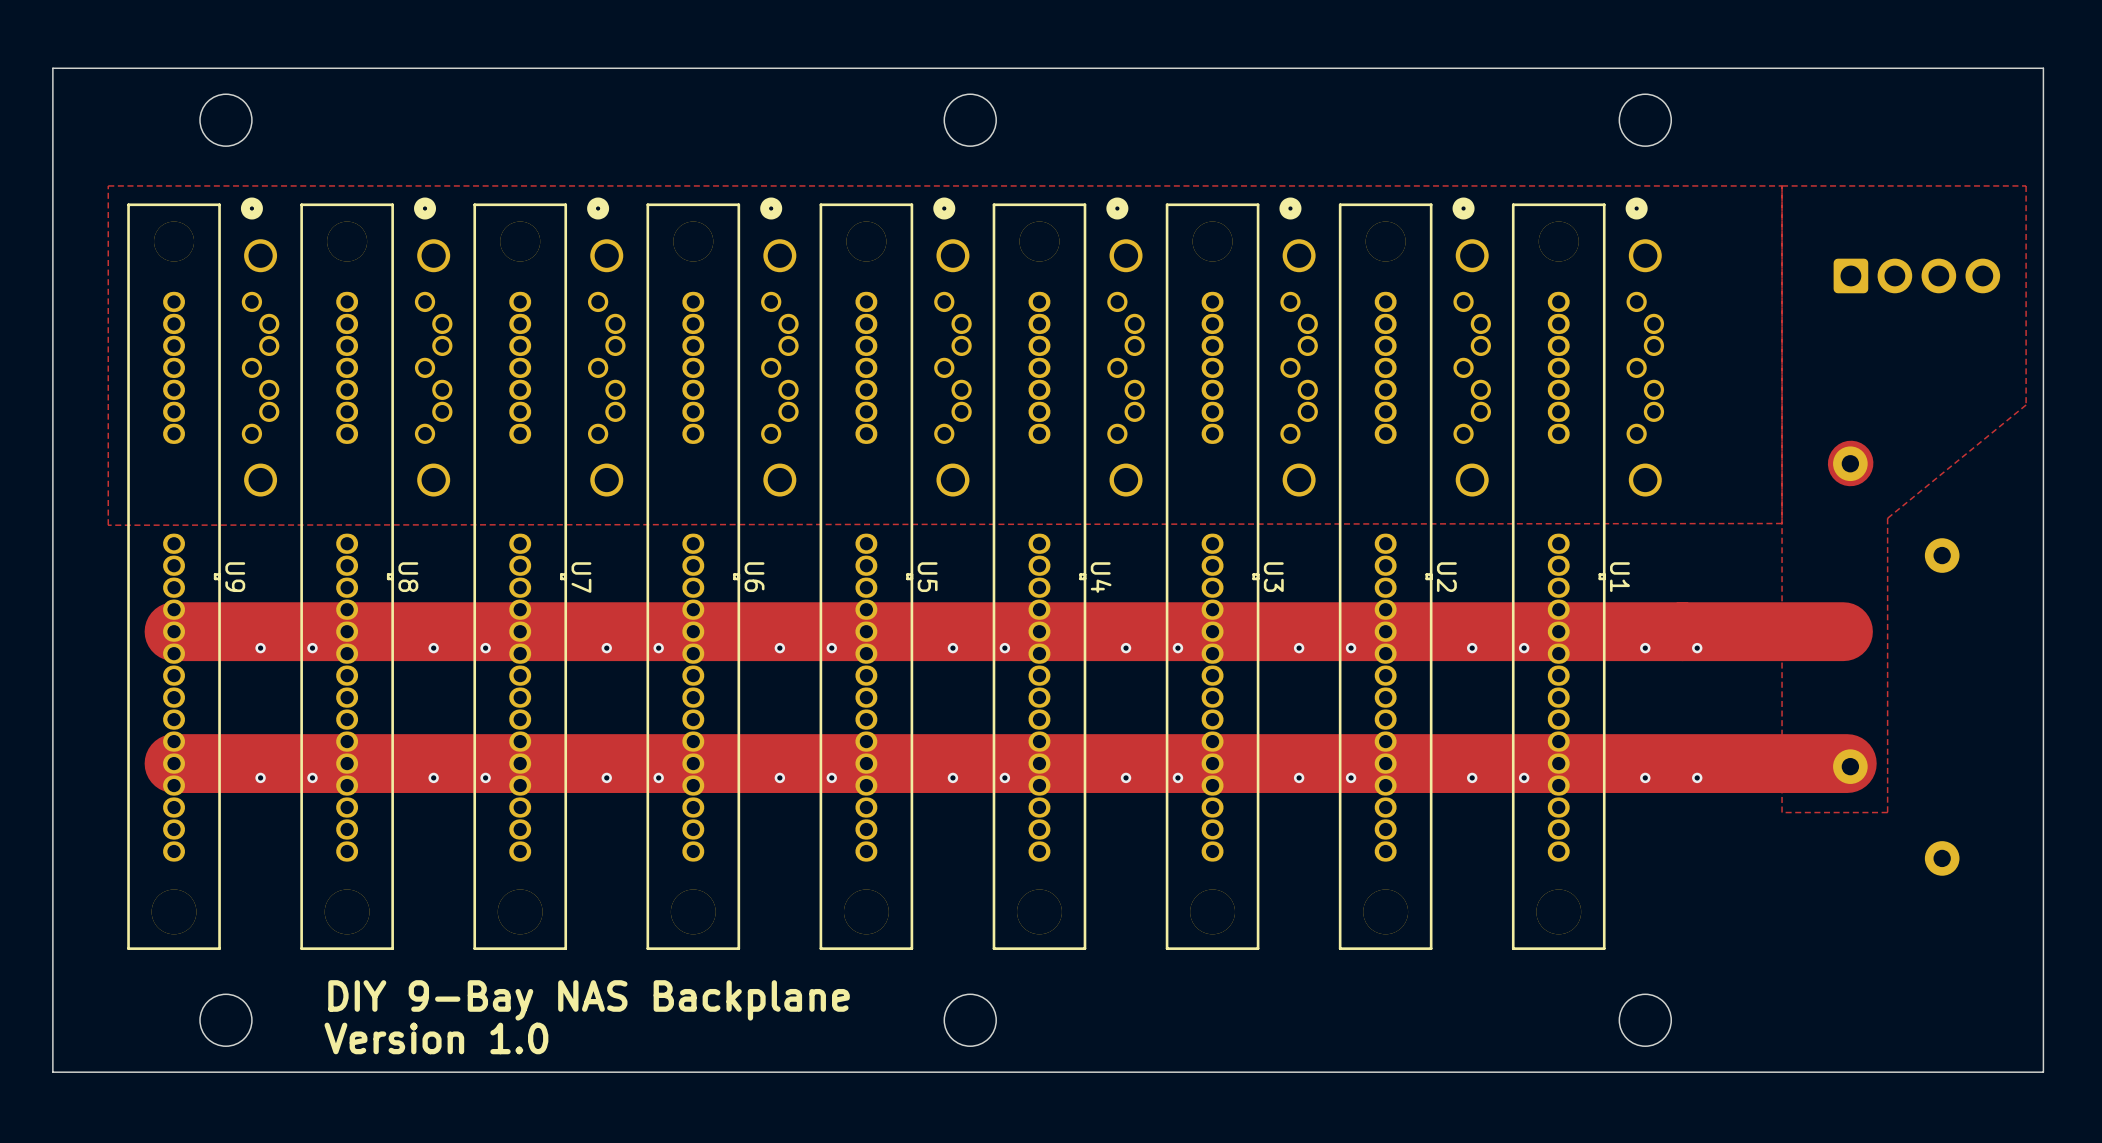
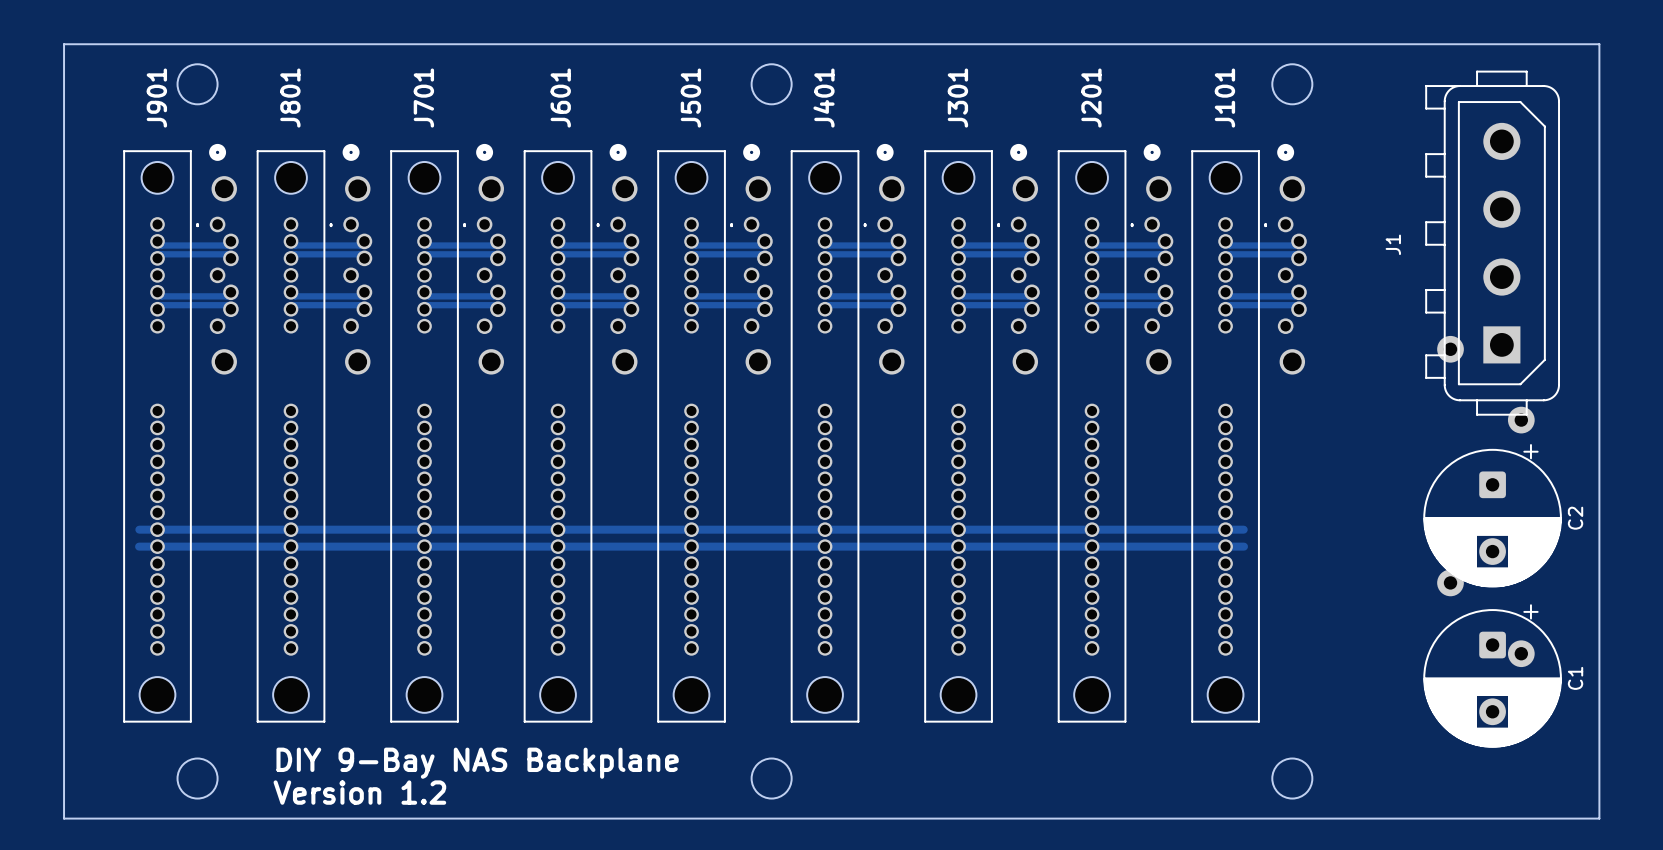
zone outline: (1782, 185) (1782, 812) (1887, 812) (1887, 518) (2026, 405) (2026, 185) (108, 185) (108, 525) (1782, 523) -> none
part: (1916, 275) -> none
track: none -> (157, 241) (161, 245) (226, 245) (230, 241)
track: none -> (291, 241) (295, 245) (360, 245) (364, 241)
track: none -> (424, 241) (428, 245) (493, 245) (497, 241)
track: none -> (558, 241) (562, 245) (627, 245) (631, 241)
track: none -> (691, 241) (695, 245) (760, 245) (764, 241)
track: none -> (825, 241) (829, 245) (894, 245) (898, 241)
track: none -> (958, 241) (962, 245) (1027, 245) (1031, 241)
track: none -> (1092, 241) (1096, 245) (1161, 245) (1165, 241)
track: none -> (1225, 241) (1229, 245) (1294, 245) (1299, 241)
J1: none -> (1492, 243)
track: none -> (157, 258) (161, 254) (226, 254) (230, 258)
track: none -> (291, 258) (295, 254) (360, 254) (364, 258)
track: none -> (424, 258) (428, 254) (493, 254) (497, 258)
track: none -> (558, 258) (562, 254) (627, 254) (631, 258)
track: none -> (691, 258) (695, 254) (760, 254) (764, 258)
track: none -> (825, 258) (829, 254) (894, 254) (898, 258)
track: none -> (958, 258) (962, 254) (1027, 254) (1031, 258)
track: none -> (1092, 258) (1096, 254) (1161, 254) (1165, 258)
track: none -> (1225, 258) (1229, 254) (1294, 254) (1299, 258)
track: none -> (157, 292) (161, 296) (226, 296) (230, 292)
track: none -> (291, 292) (295, 296) (360, 296) (364, 292)
track: none -> (424, 292) (428, 296) (493, 296) (497, 292)
track: none -> (558, 292) (562, 296) (627, 296) (631, 292)
track: none -> (691, 292) (695, 296) (760, 296) (764, 292)
track: none -> (825, 292) (829, 296) (894, 296) (898, 292)
track: none -> (958, 292) (962, 296) (1027, 296) (1031, 292)
track: none -> (1092, 292) (1096, 296) (1161, 296) (1165, 292)
track: none -> (1225, 292) (1229, 296) (1294, 296) (1299, 292)
track: none -> (157, 309) (161, 305) (226, 305) (230, 309)
track: none -> (291, 309) (295, 305) (360, 305) (364, 309)
track: none -> (424, 309) (428, 305) (493, 305) (497, 309)
track: none -> (558, 309) (562, 305) (627, 305) (631, 309)
track: none -> (691, 309) (695, 305) (760, 305) (764, 309)
track: none -> (825, 309) (829, 305) (894, 305) (898, 309)
track: none -> (958, 309) (962, 305) (1027, 305) (1031, 309)
track: none -> (1092, 309) (1096, 305) (1161, 305) (1165, 309)
track: none -> (1225, 309) (1229, 305) (1294, 305) (1299, 309)
track: (1850, 463) (1850, 463) -> none
U9: (174, 576) -> none
J901: none -> (161, 436)
U8: (347, 576) -> none
J801: none -> (294, 436)
U7: (520, 576) -> none
J701: none -> (428, 436)
U6: (693, 576) -> none
J601: none -> (561, 436)
U5: (866, 576) -> none
J501: none -> (695, 436)
U4: (1039, 576) -> none
J401: none -> (828, 436)
U3: (1212, 576) -> none
J301: none -> (962, 436)
U2: (1385, 576) -> none
J201: none -> (1095, 436)
U1: (1558, 576) -> none
J101: none -> (1229, 436)
track: (174, 631) (1843, 631) -> none
via: (260, 648) -> none
via: (312, 648) -> none
via: (433, 648) -> none
via: (485, 648) -> none
via: (606, 648) -> none
via: (658, 648) -> none
via: (779, 648) -> none
via: (831, 648) -> none
via: (952, 648) -> none
via: (1004, 648) -> none
via: (1126, 648) -> none
via: (1177, 648) -> none
via: (1299, 648) -> none
via: (1351, 648) -> none
via: (1472, 648) -> none
via: (1524, 648) -> none
via: (1645, 648) -> none
via: (1697, 648) -> none
C2: none -> (1492, 515)
track: none -> (139, 529) (1243, 529)
track: none -> (139, 546) (1243, 546)
track: (174, 763) (1847, 763) (1850, 766) -> none
via: (260, 777) -> none
via: (312, 777) -> none
via: (433, 777) -> none
via: (485, 777) -> none
via: (606, 777) -> none
via: (658, 777) -> none
via: (779, 777) -> none
via: (831, 777) -> none
via: (952, 777) -> none
via: (1004, 777) -> none
via: (1126, 777) -> none
via: (1177, 777) -> none
via: (1299, 777) -> none
via: (1351, 777) -> none
via: (1472, 777) -> none
via: (1524, 777) -> none
via: (1645, 777) -> none
via: (1697, 777) -> none
C1: none -> (1492, 676)
text: Version 1.0 (436, 1038) -> Version 1.2 (359, 792)

